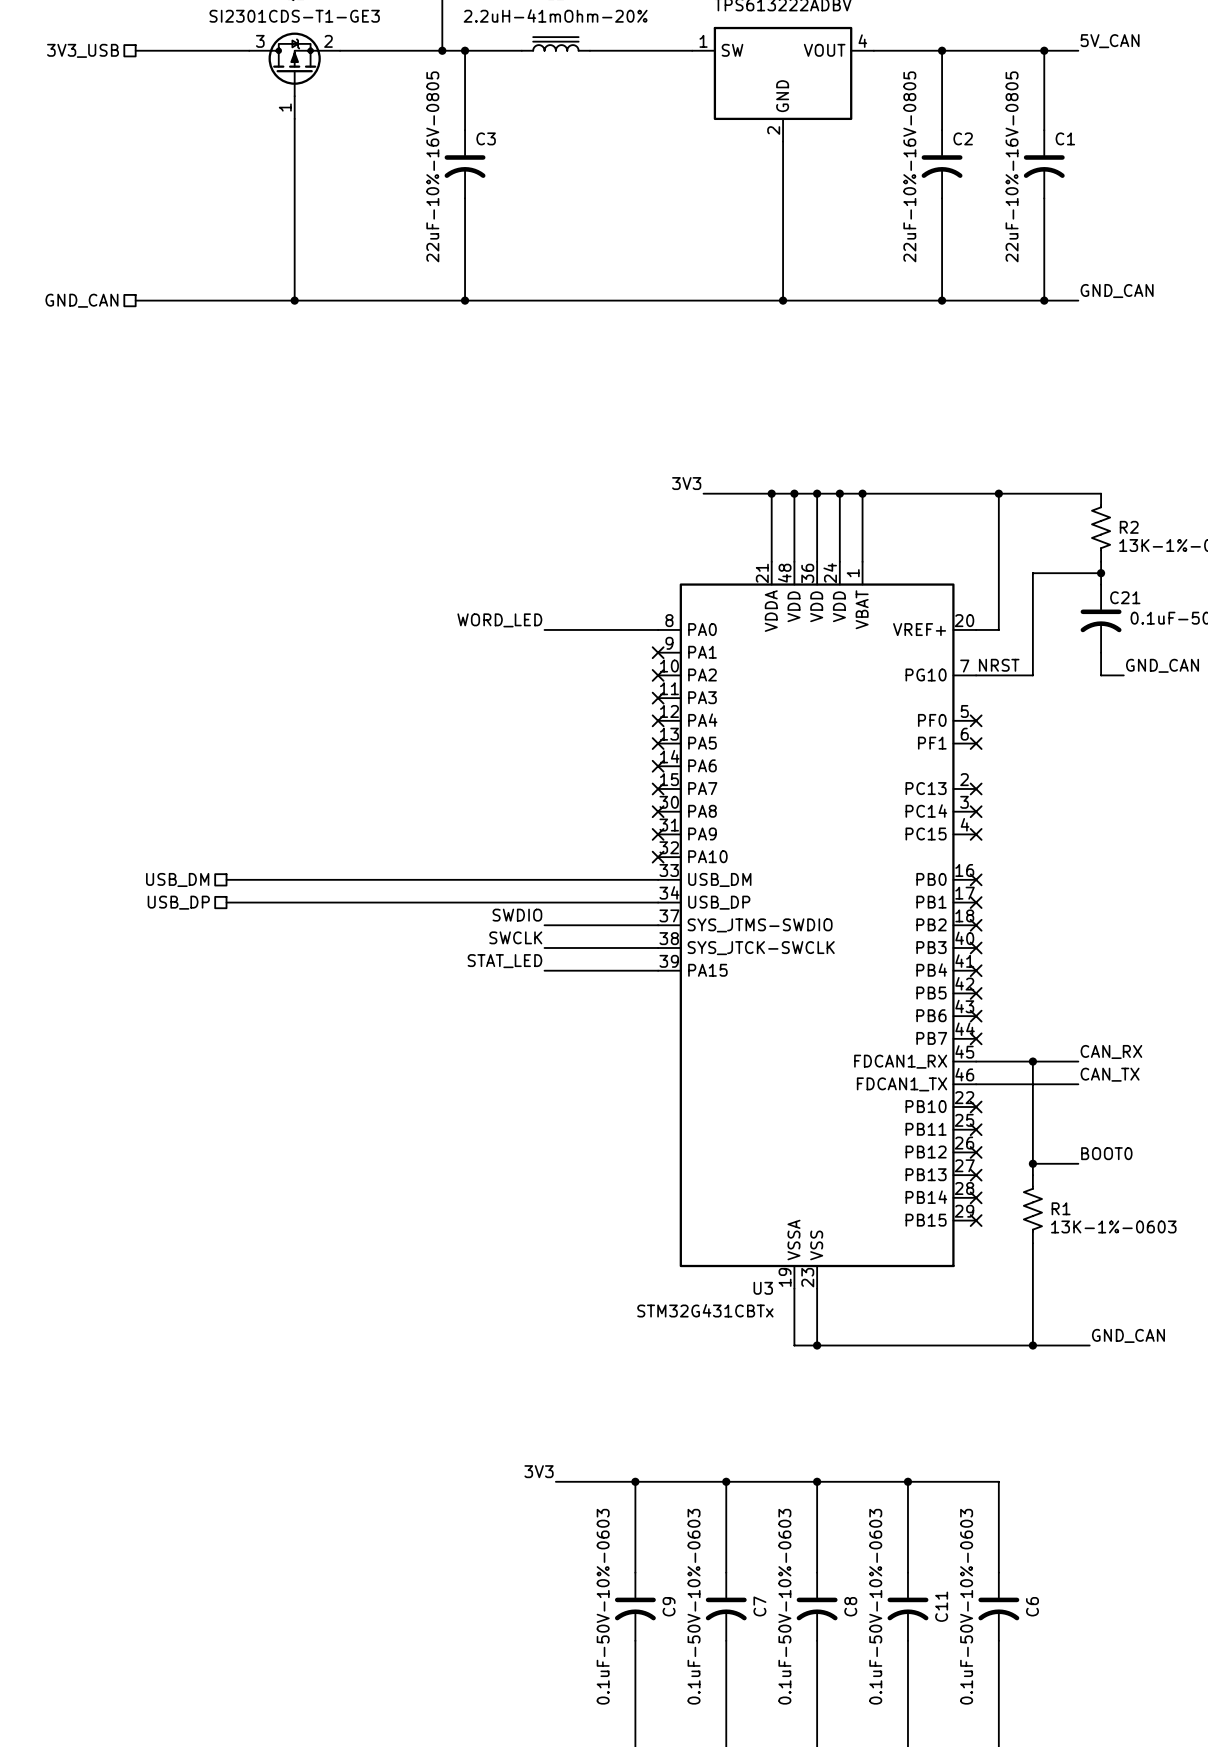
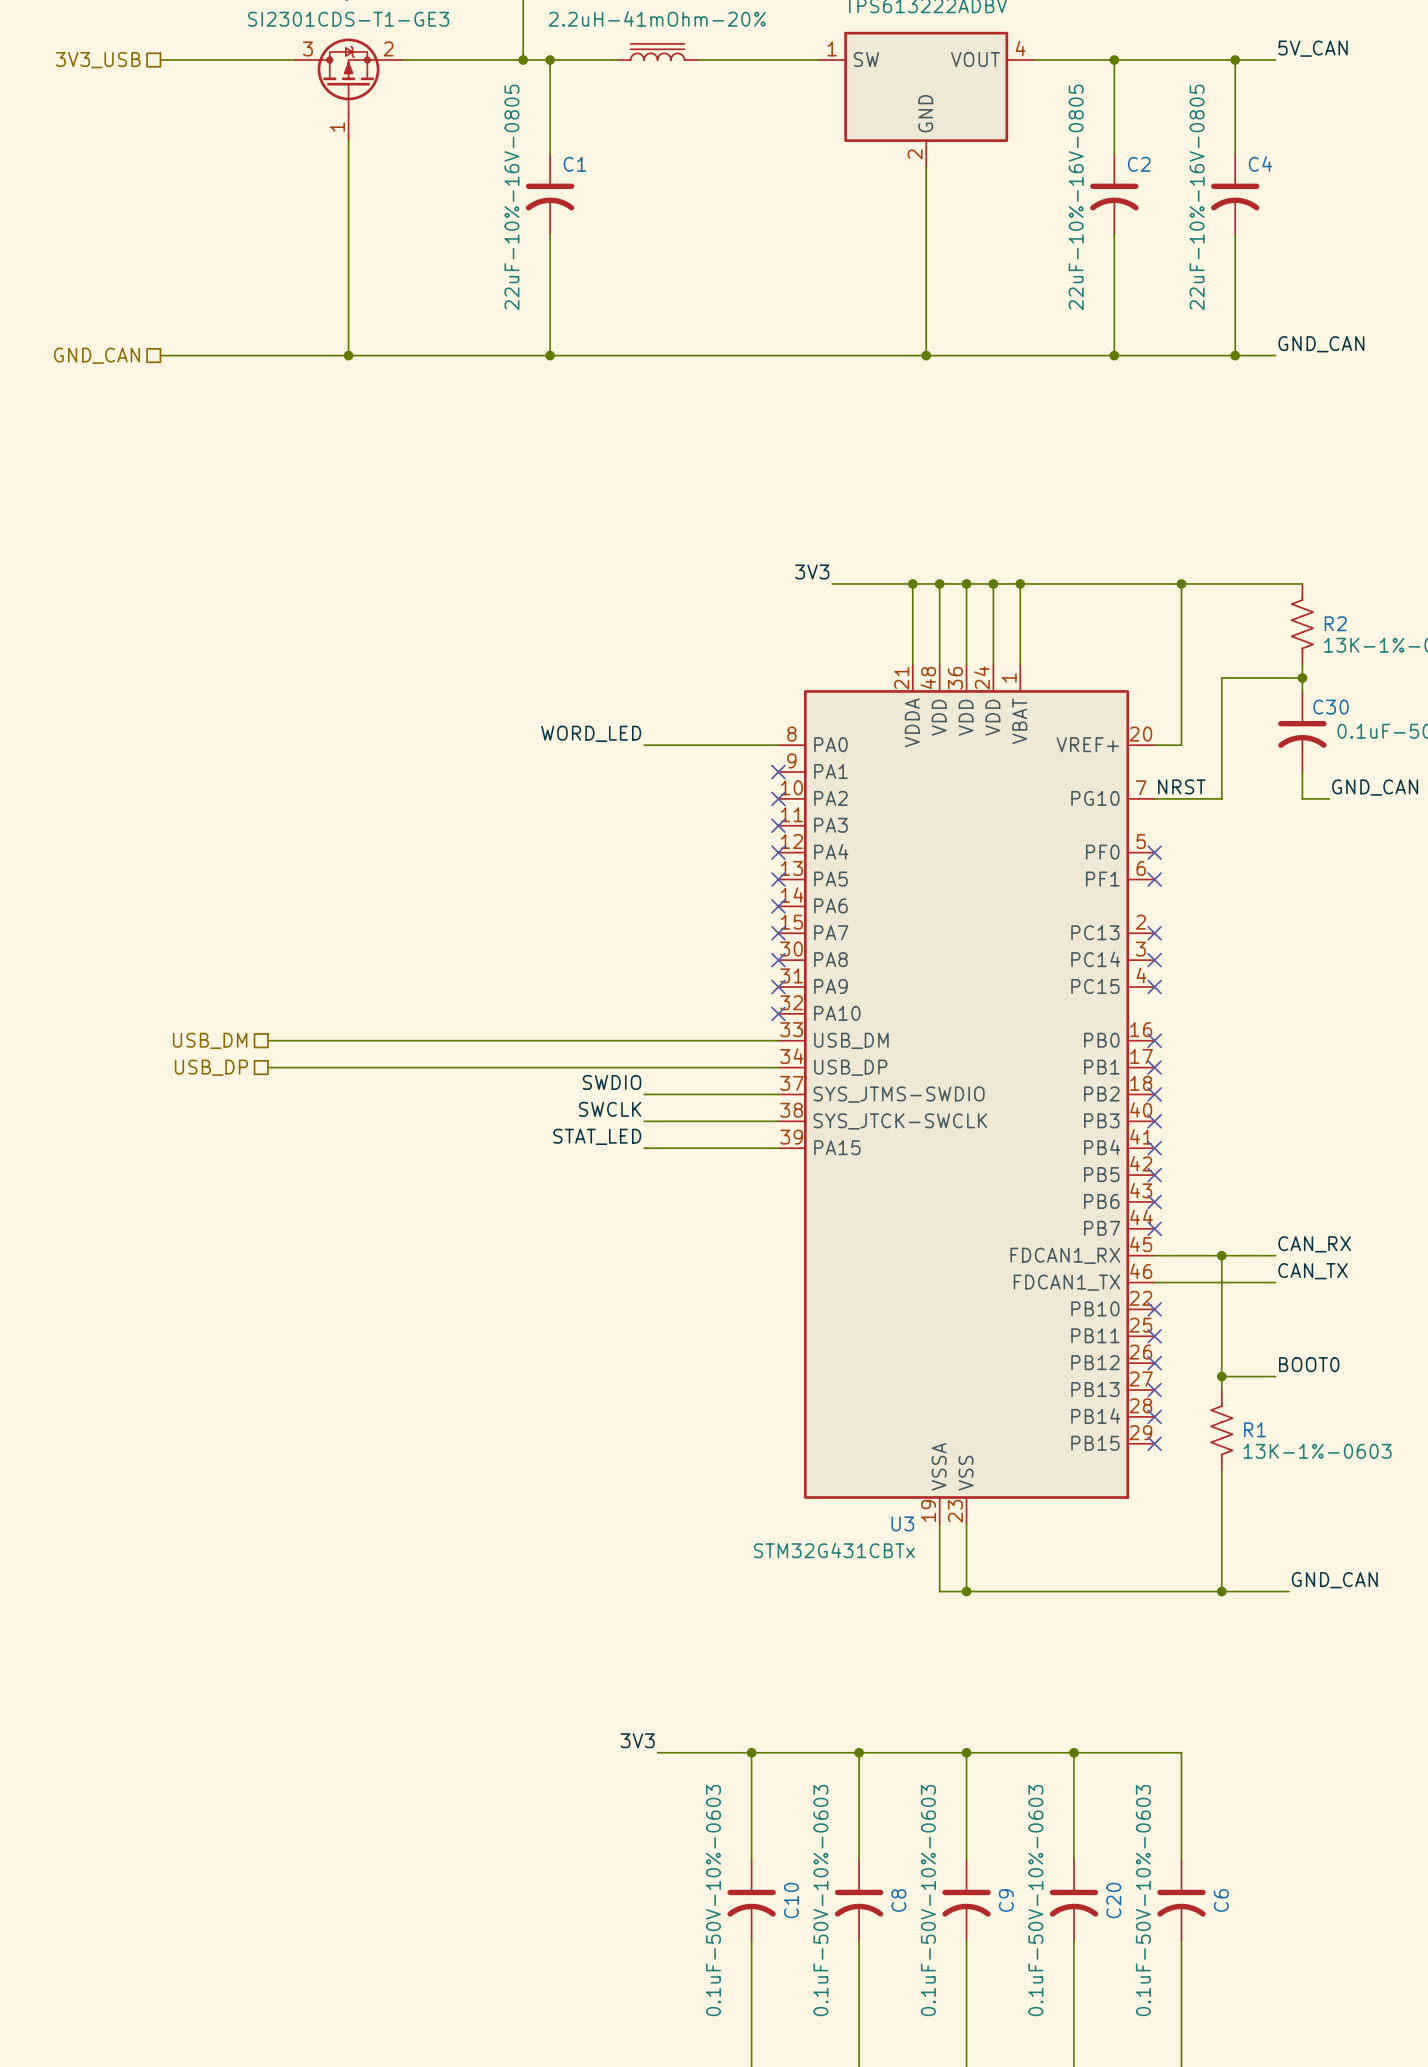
C3 name: C3 (486, 138) -> C1 (574, 164)
C1 name: C1 (1065, 138) -> C4 (1260, 163)
C21 name: C21 (1125, 597) -> C30 (1331, 707)
C9 name: C9 (669, 1606) -> C10 (791, 1900)
C7 name: C7 (759, 1606) -> C8 (898, 1900)
C8 name: C8 (850, 1606) -> C9 (1006, 1900)
C11 name: C11 (941, 1606) -> C20 (1113, 1900)

